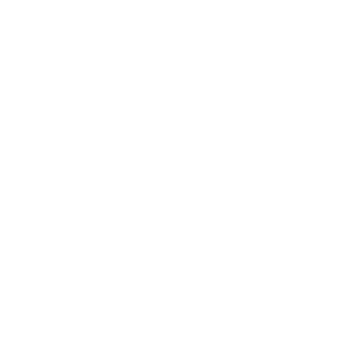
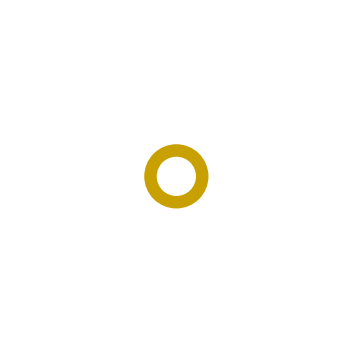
part: none -> (176, 176)

